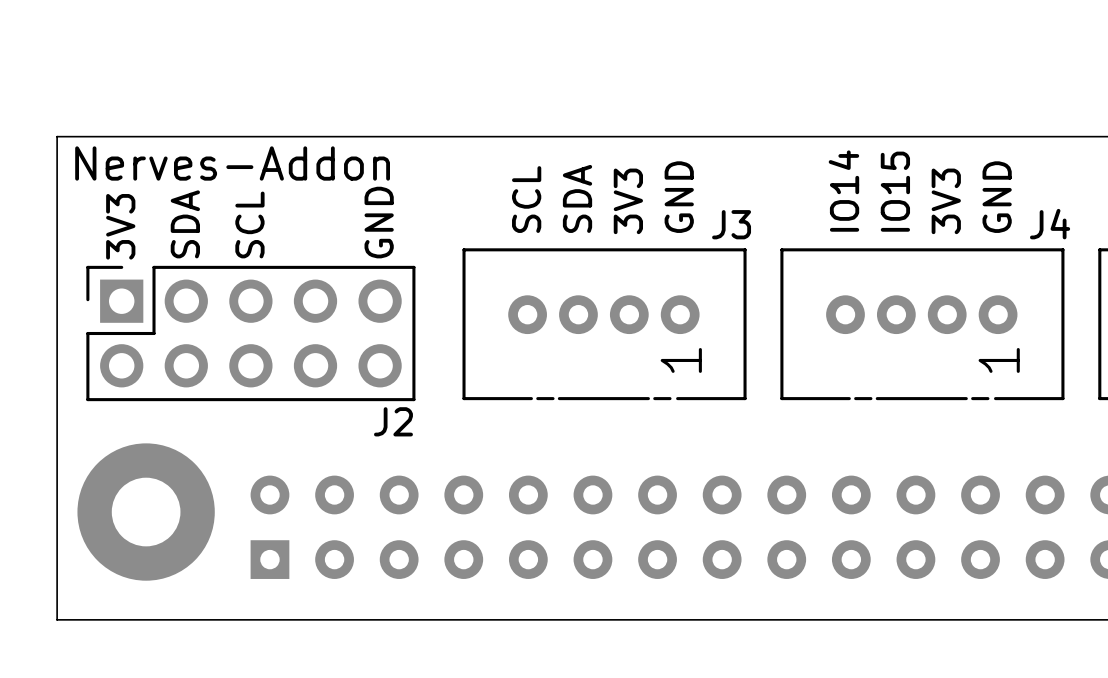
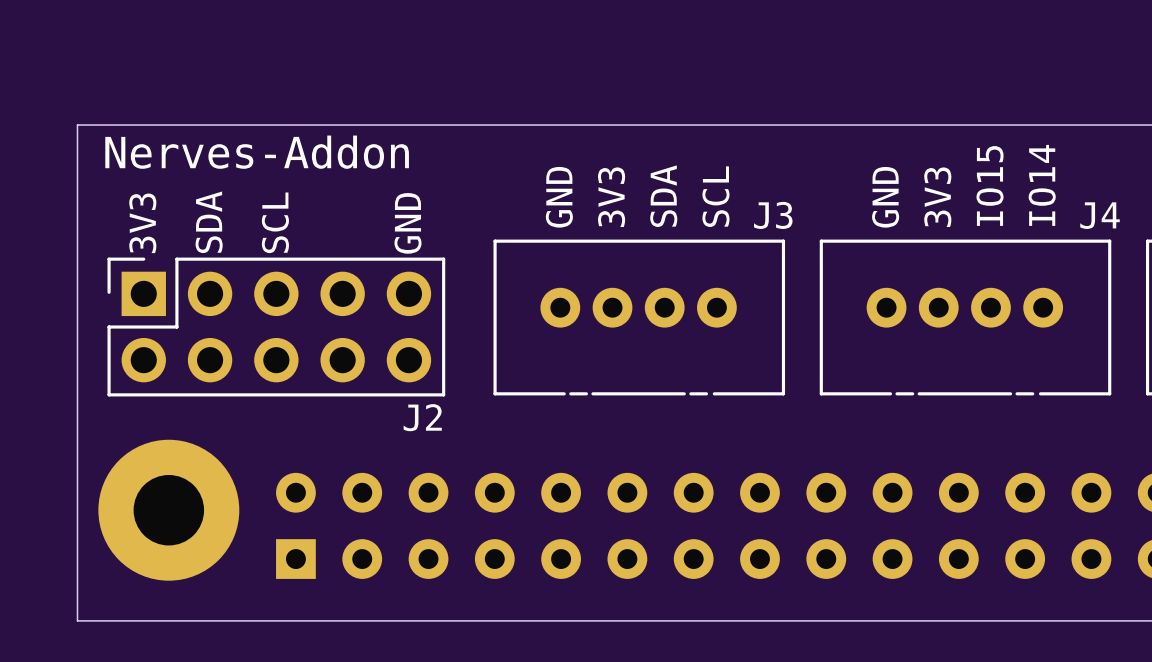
text: IO14 (843, 191) -> GND (885, 197)
text: IO15 (895, 191) -> 3V3 (937, 197)
text: GND (679, 197) -> SCL (715, 196)
text: GND (997, 197) -> IO14 (1042, 185)
text: SDA (577, 198) -> 3V3 (611, 197)
text: SCL (526, 199) -> GND (559, 197)
text: 3V3 (628, 201) -> SDA (663, 196)
text: 3V3 (946, 201) -> IO15 (990, 185)
J3 text: 1 (681, 360) -> none
J4 text: 1 (999, 360) -> none

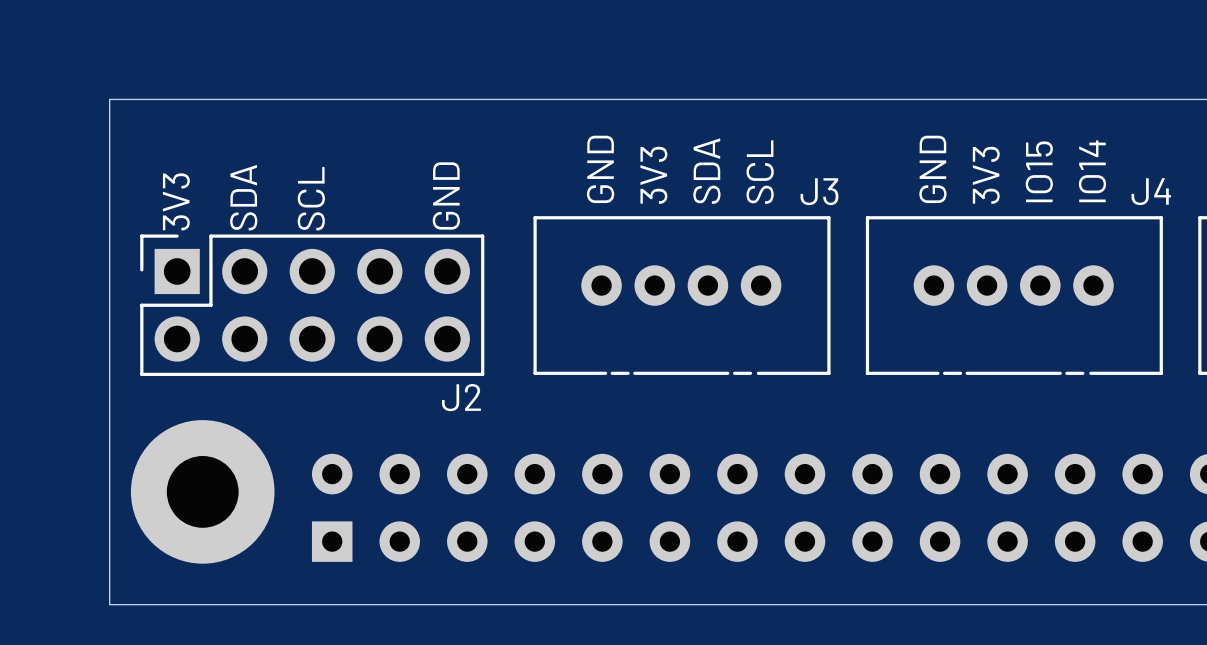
text: Nerves-Addon (257, 152) -> none

